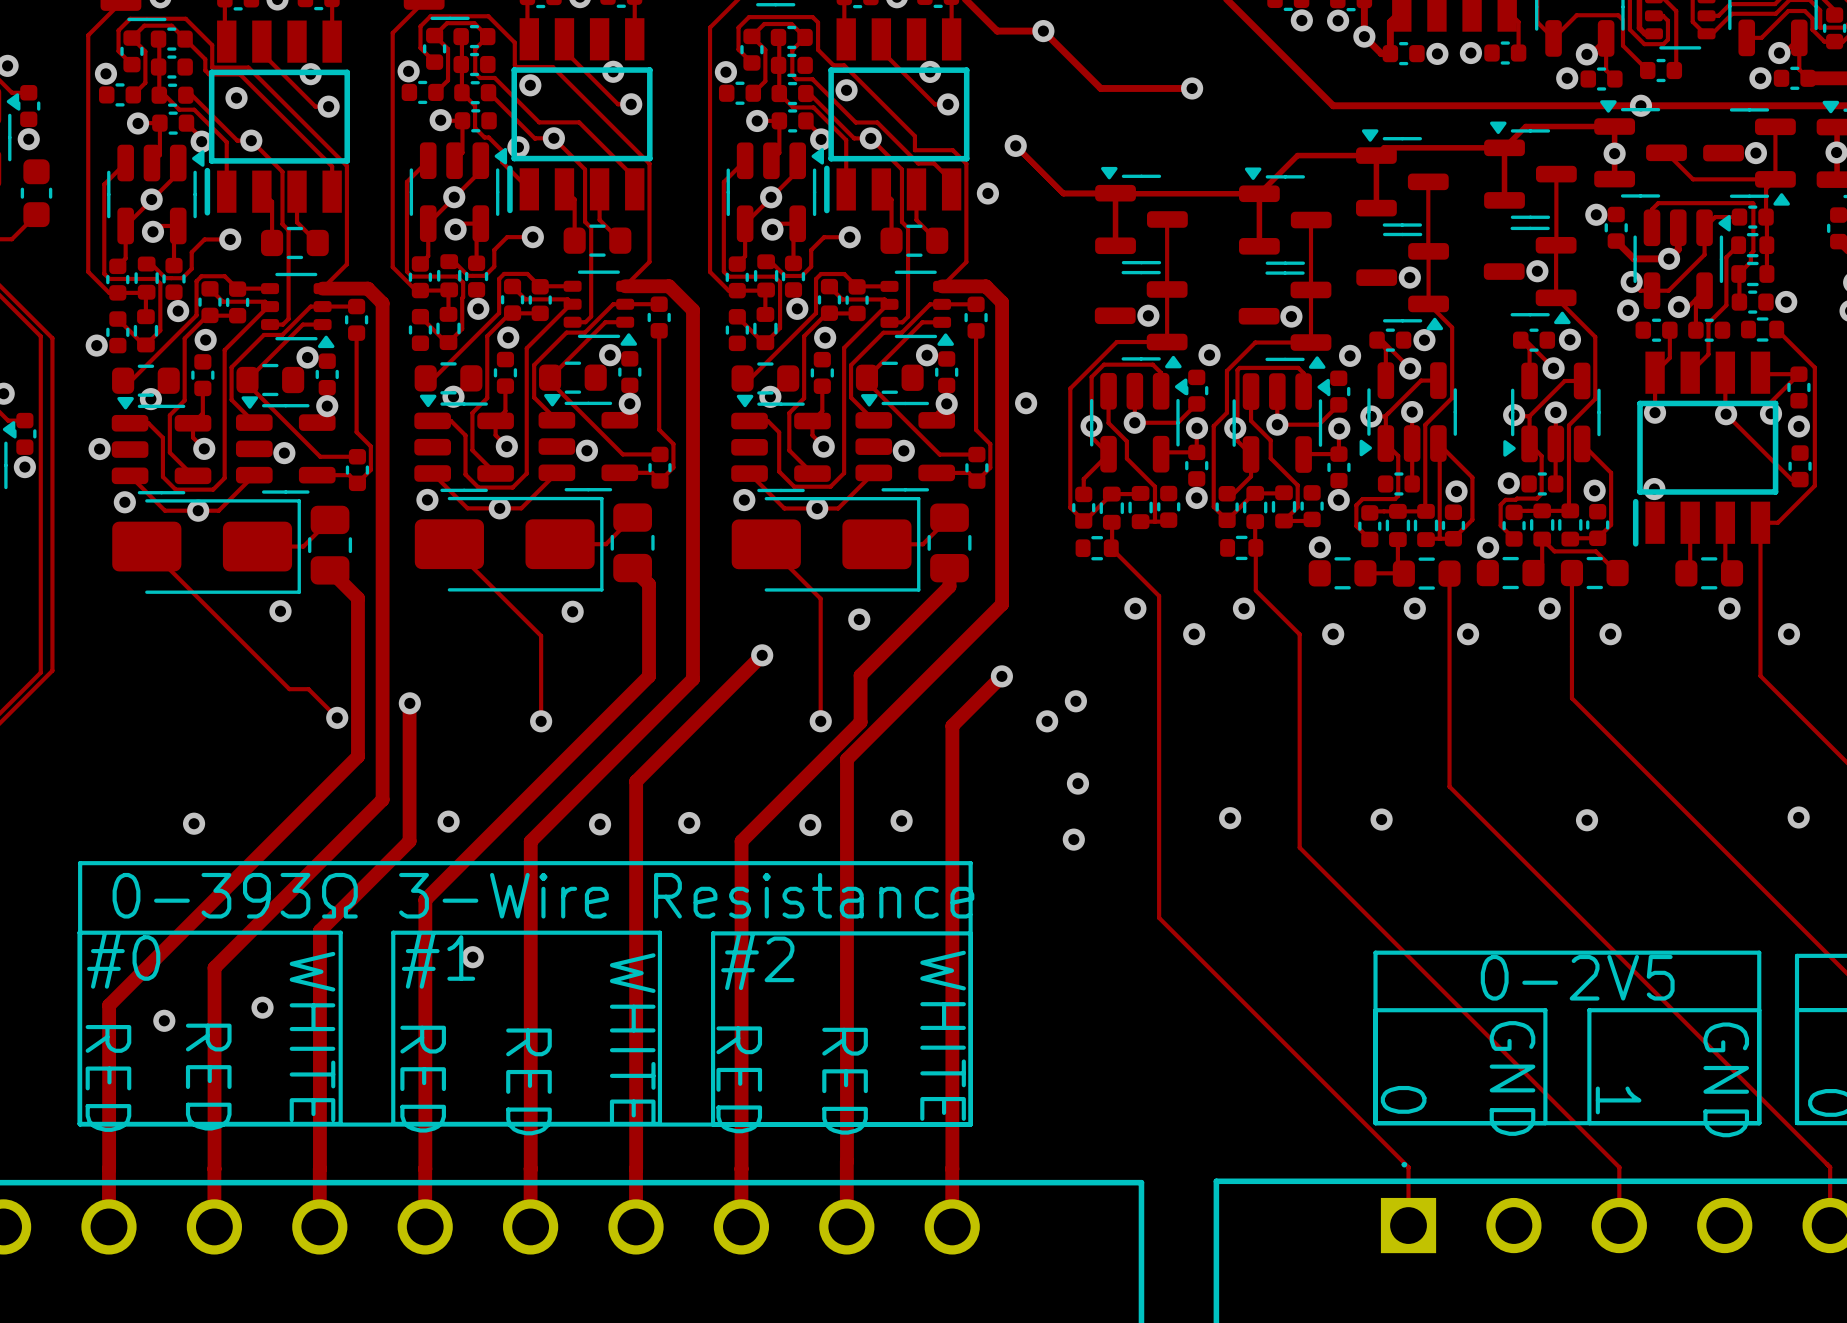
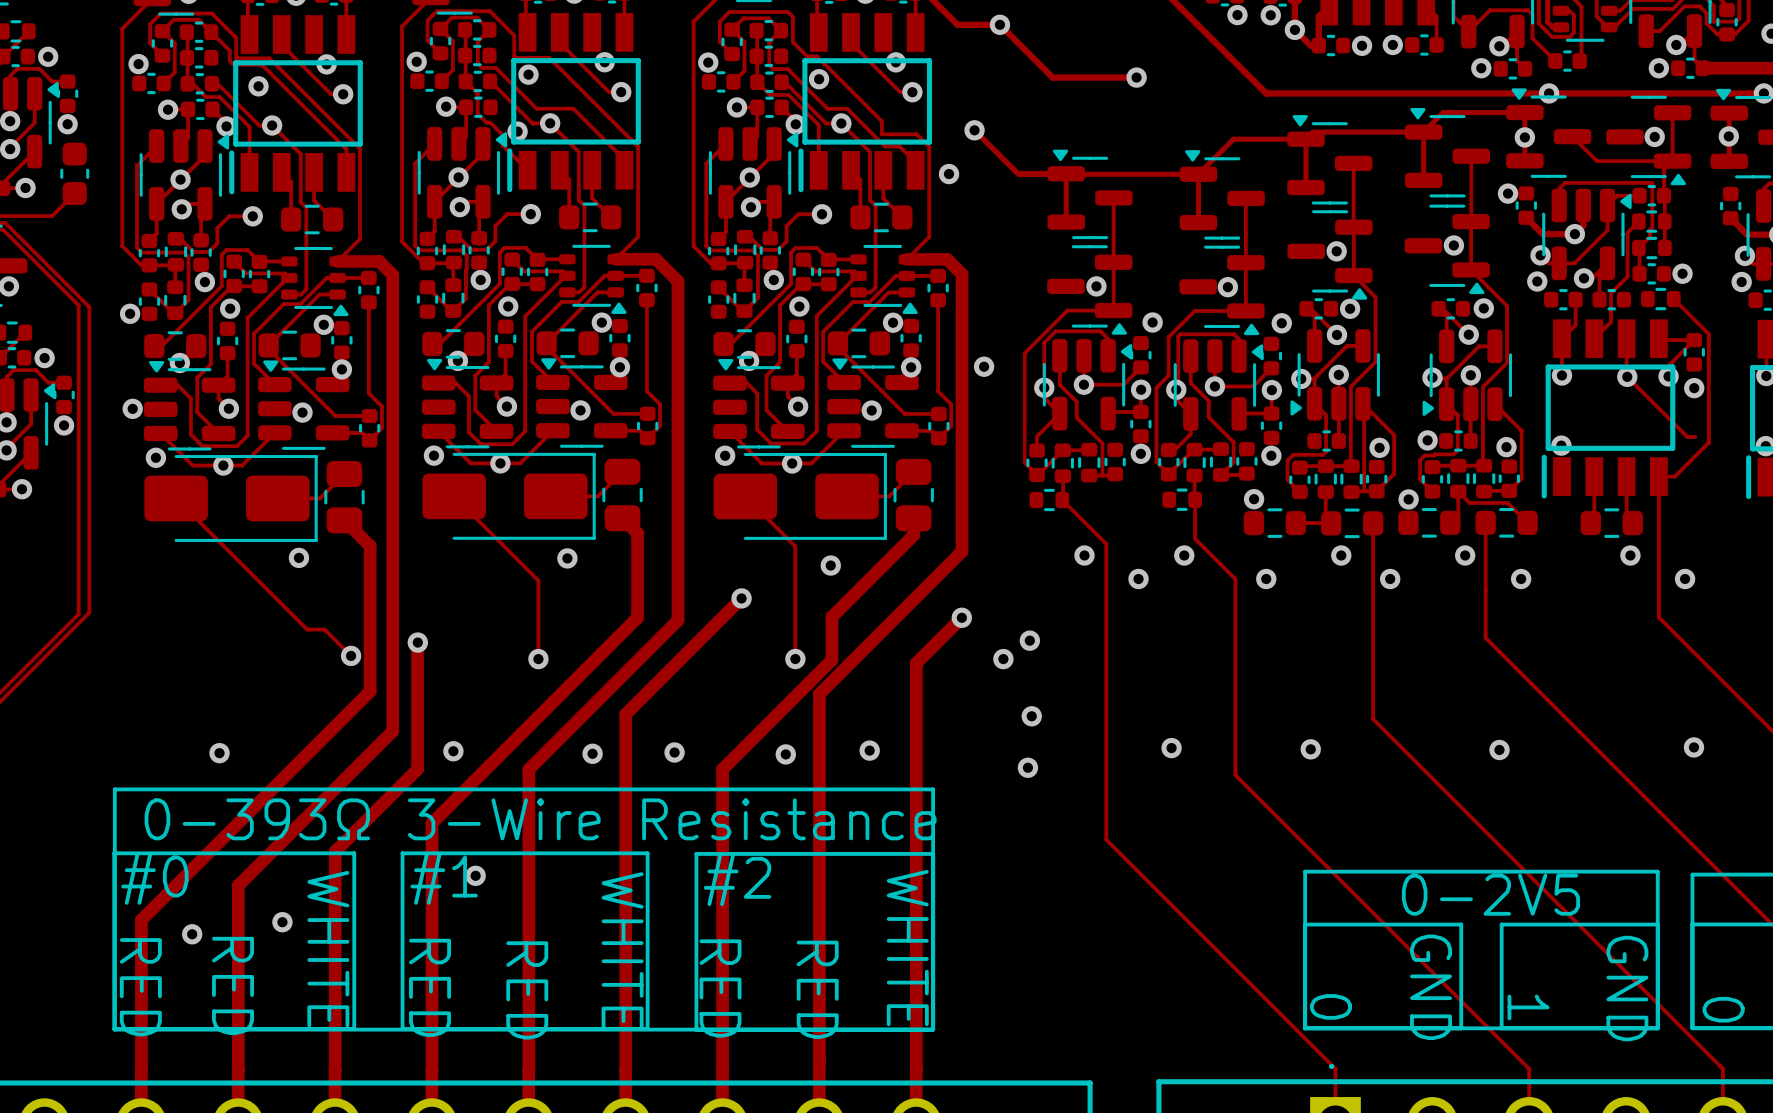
part: (1800, 466) -> none

